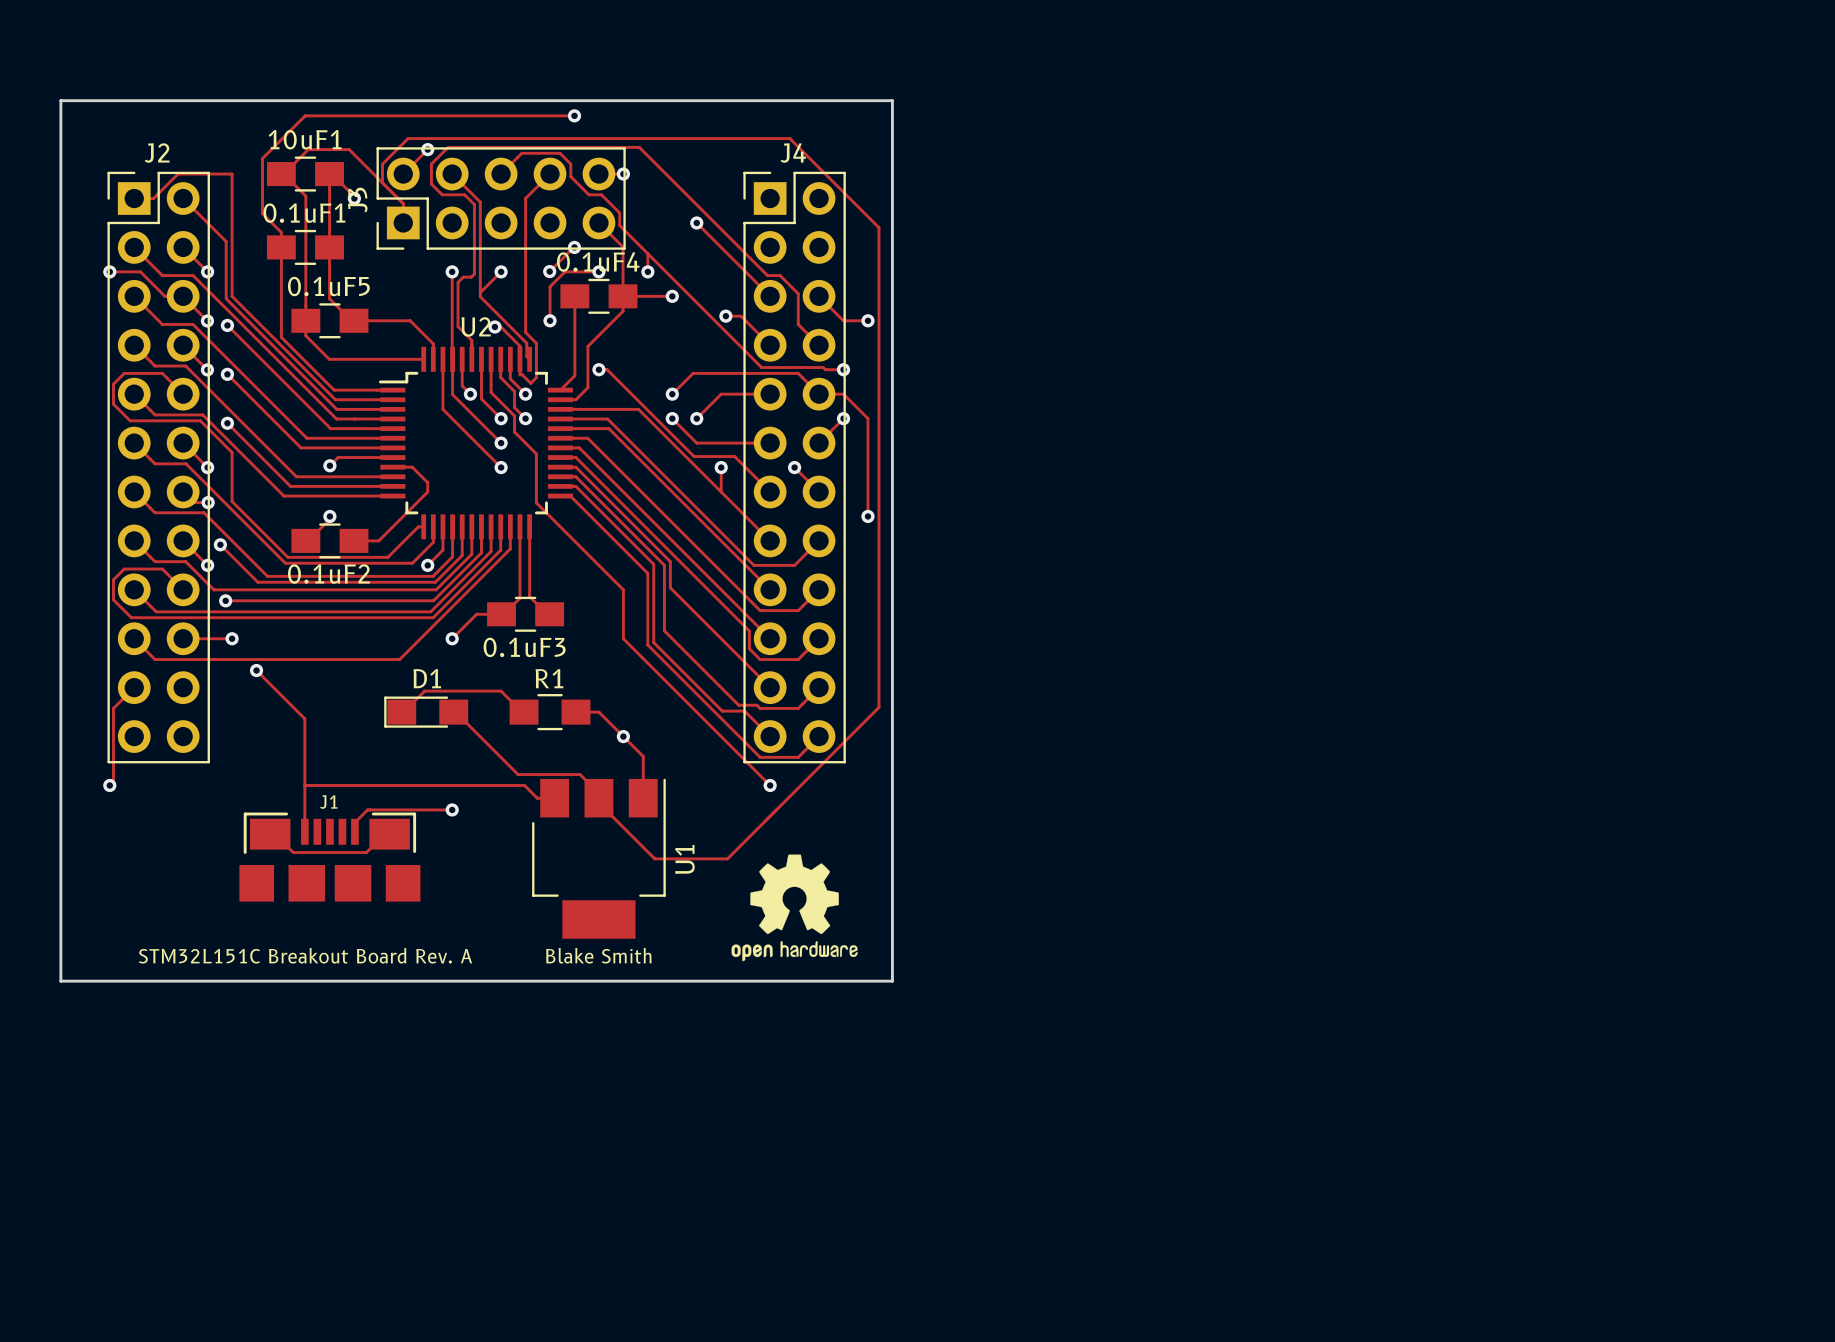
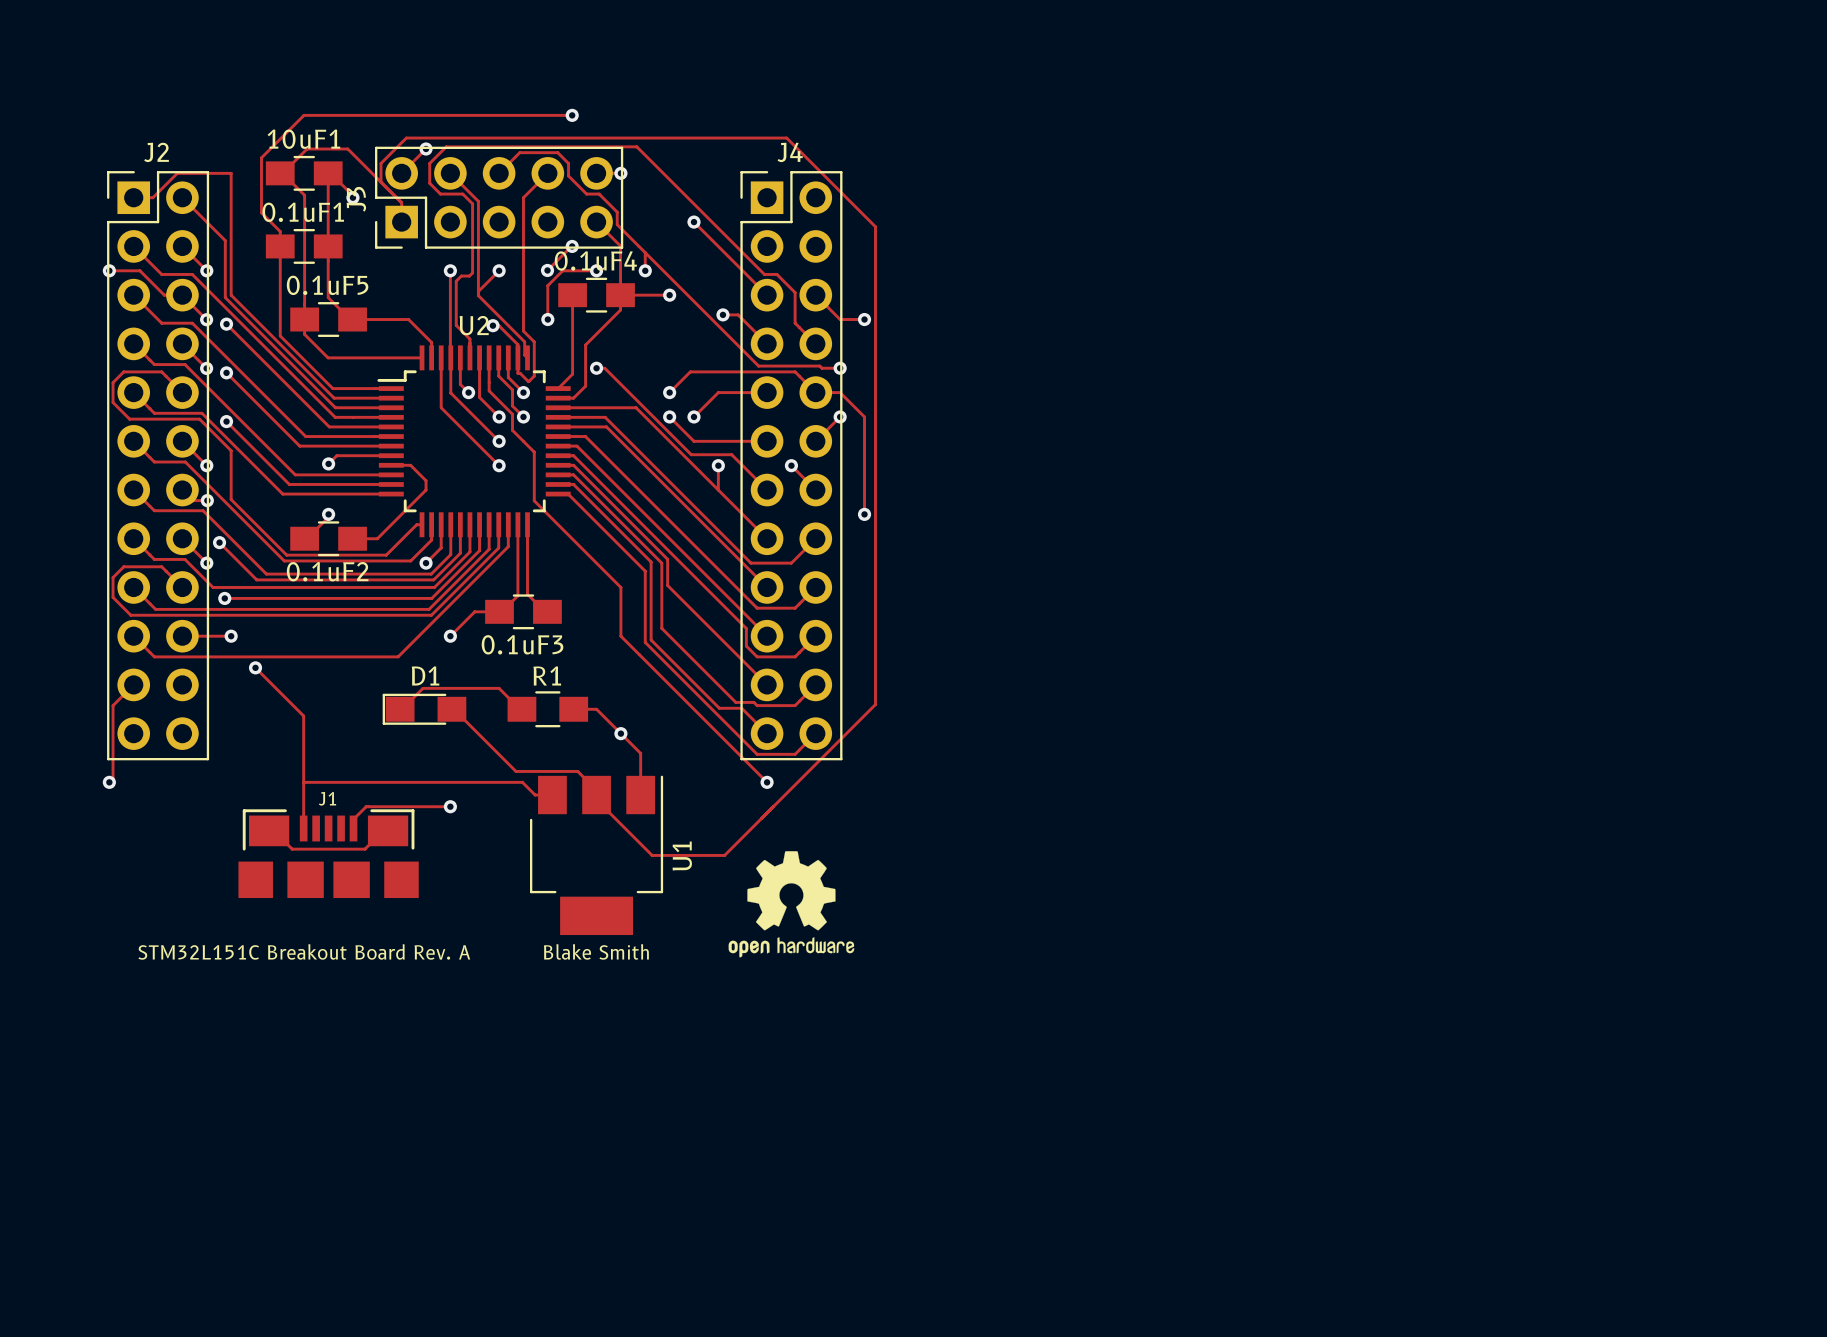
board edge: (60, 100) (892, 100) (892, 981) (60, 981) (60, 100) -> none

